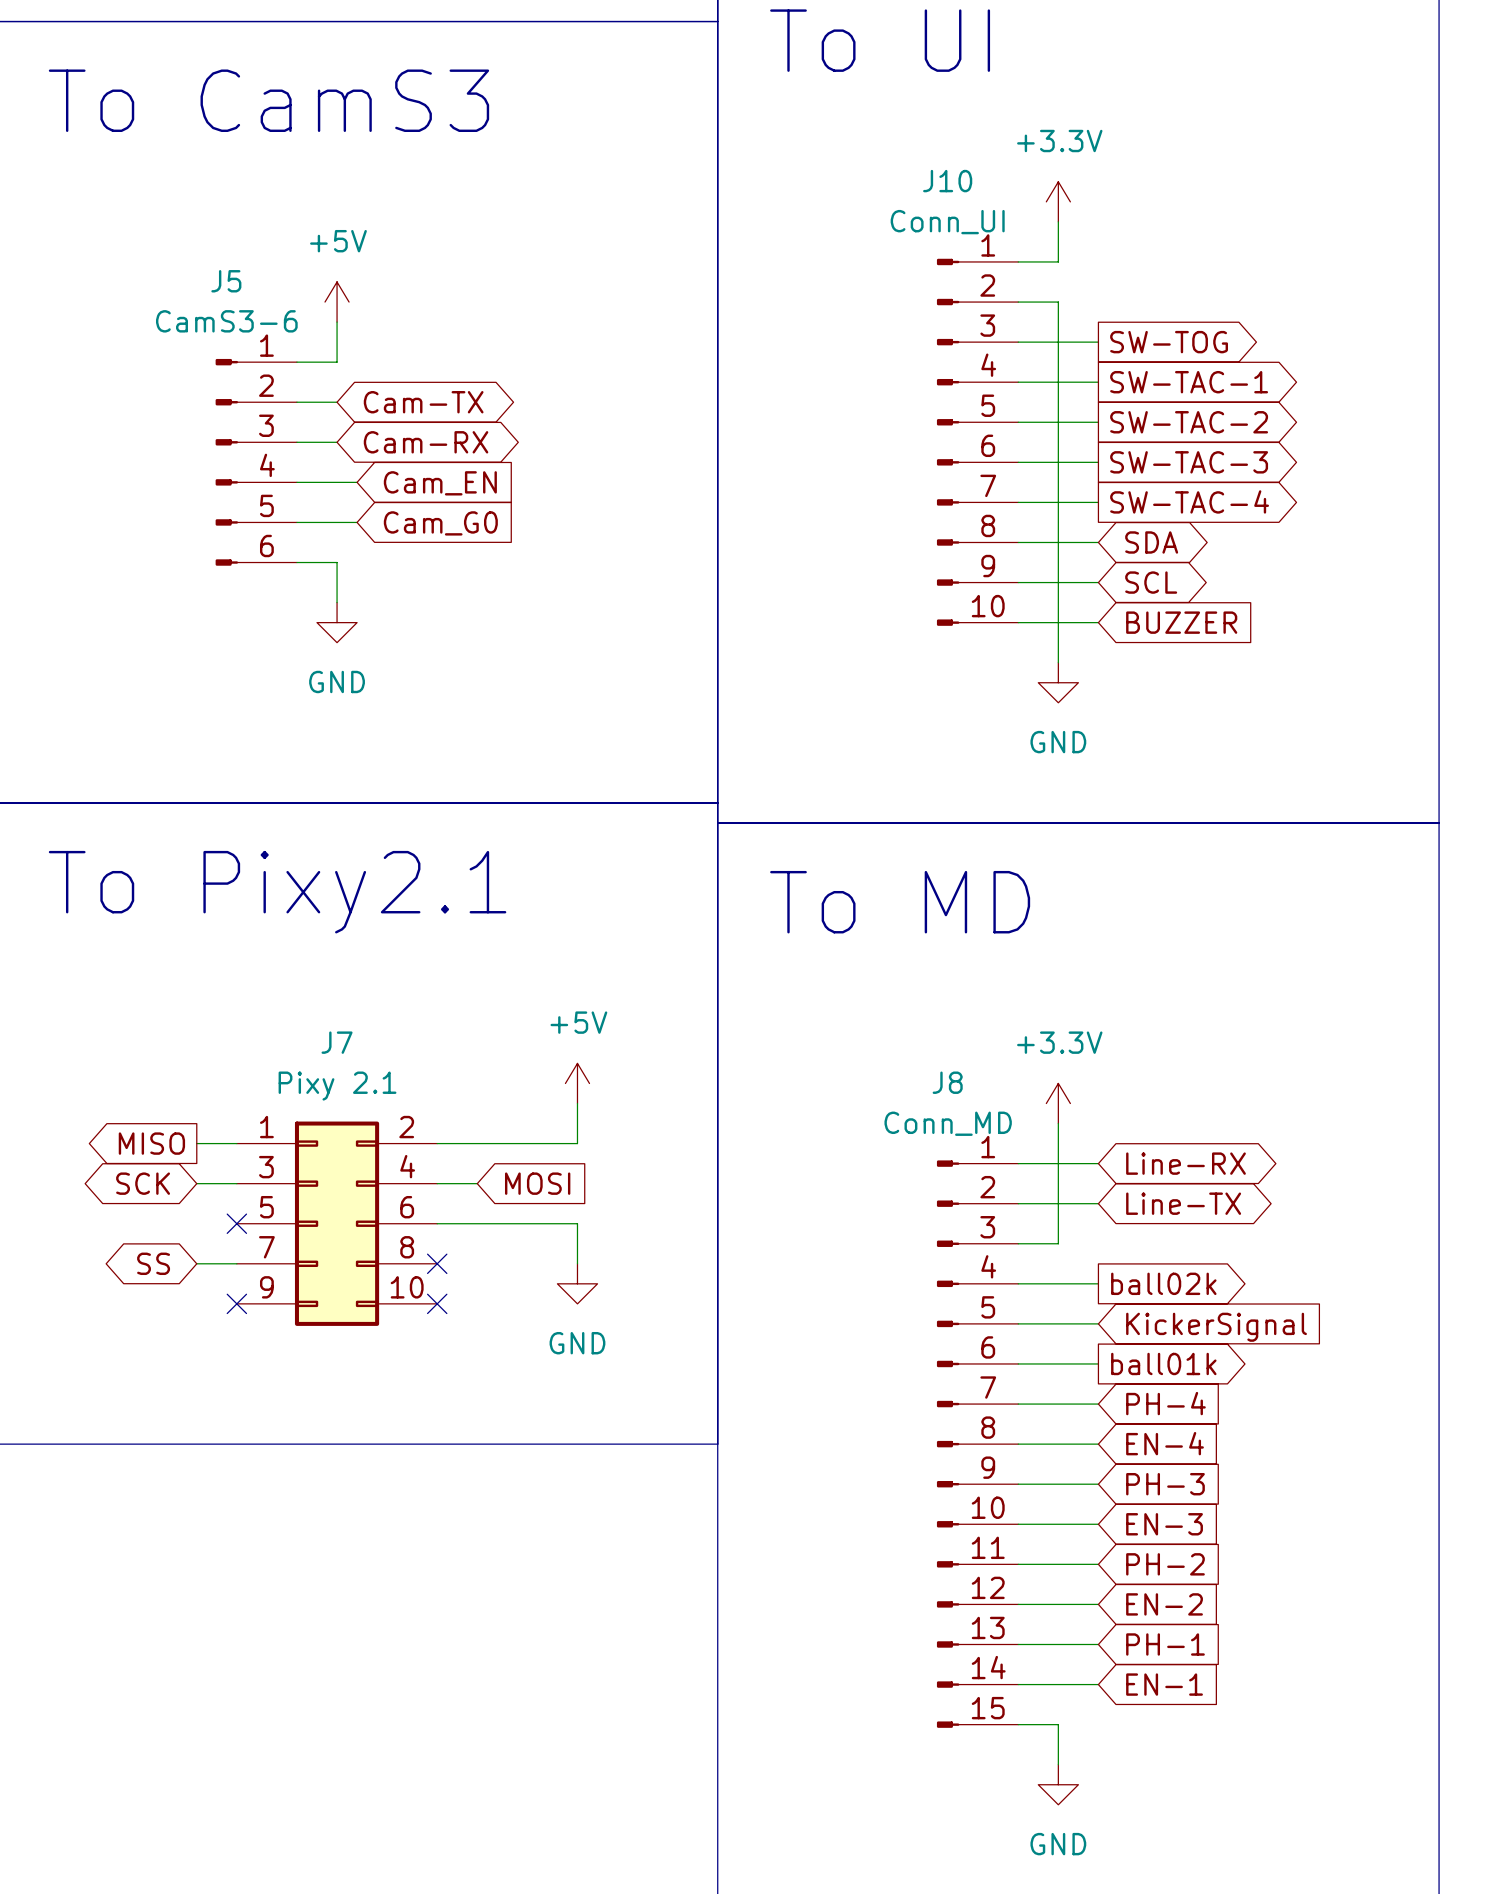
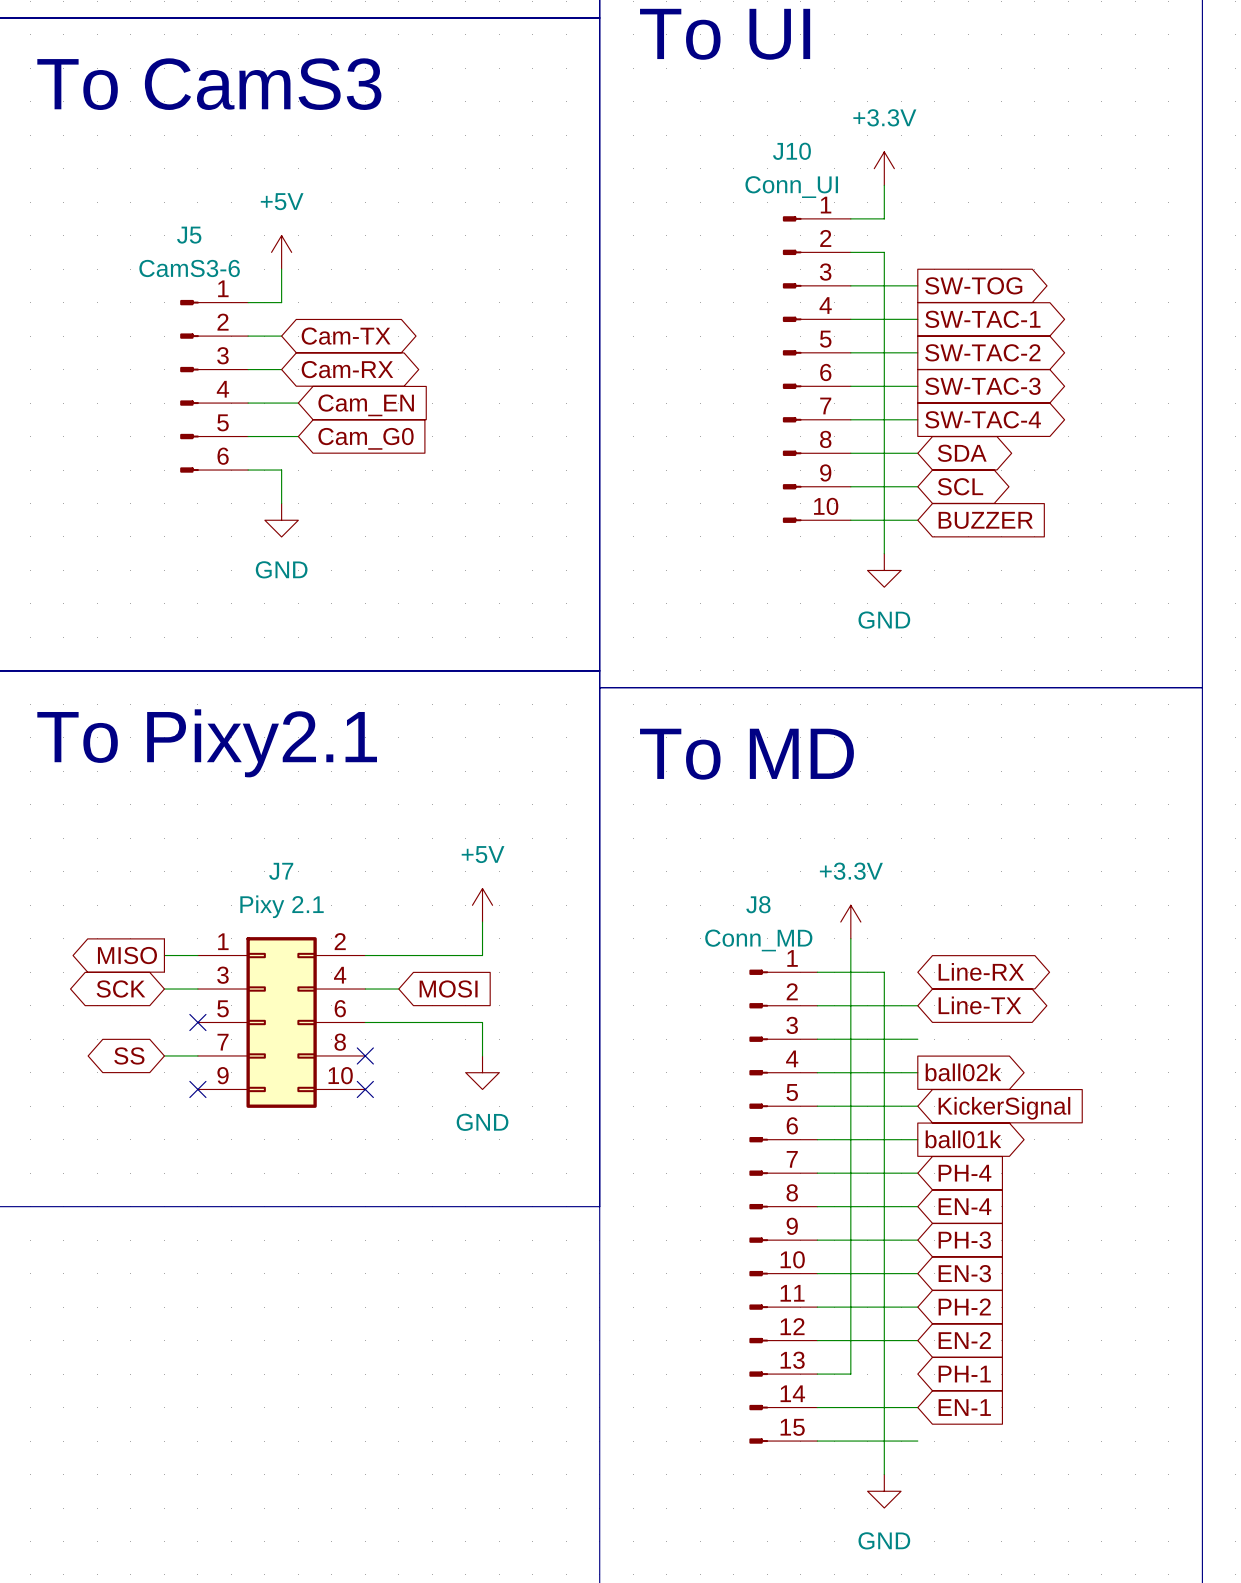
power symbol position: +3.3V (1058, 1103) -> +3.3V (850, 922)
wire: none -> (850, 938) (850, 1374) (817, 1374)
wire: (1058, 1123) (1058, 1163) (1098, 1163) -> none
wire: none -> (917, 1039) (884, 1039) (884, 1441) (917, 1441)
J8 position: (977, 1444) -> (783, 1206)
wire: (1018, 1644) (1098, 1644) -> none

